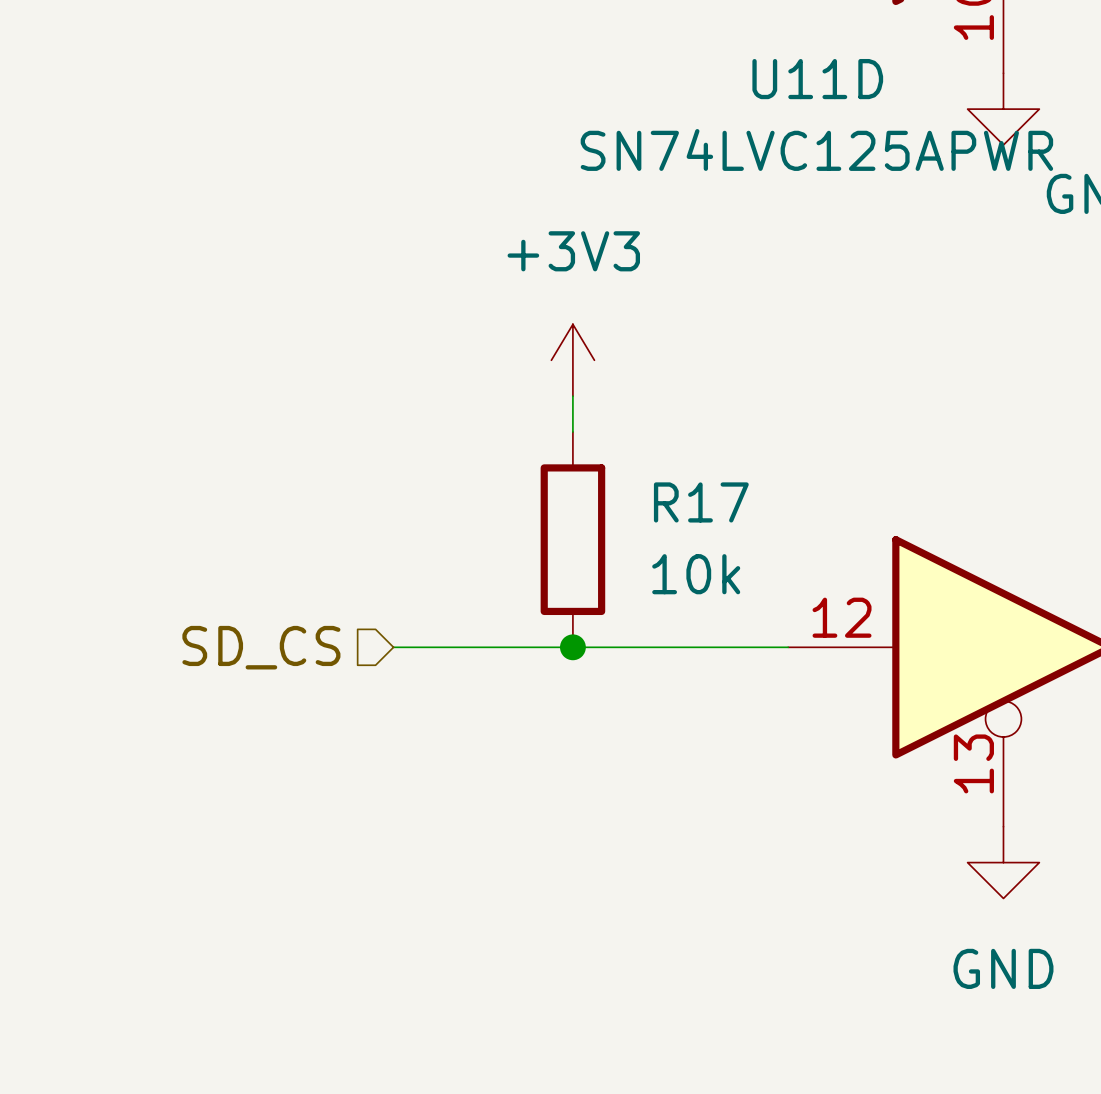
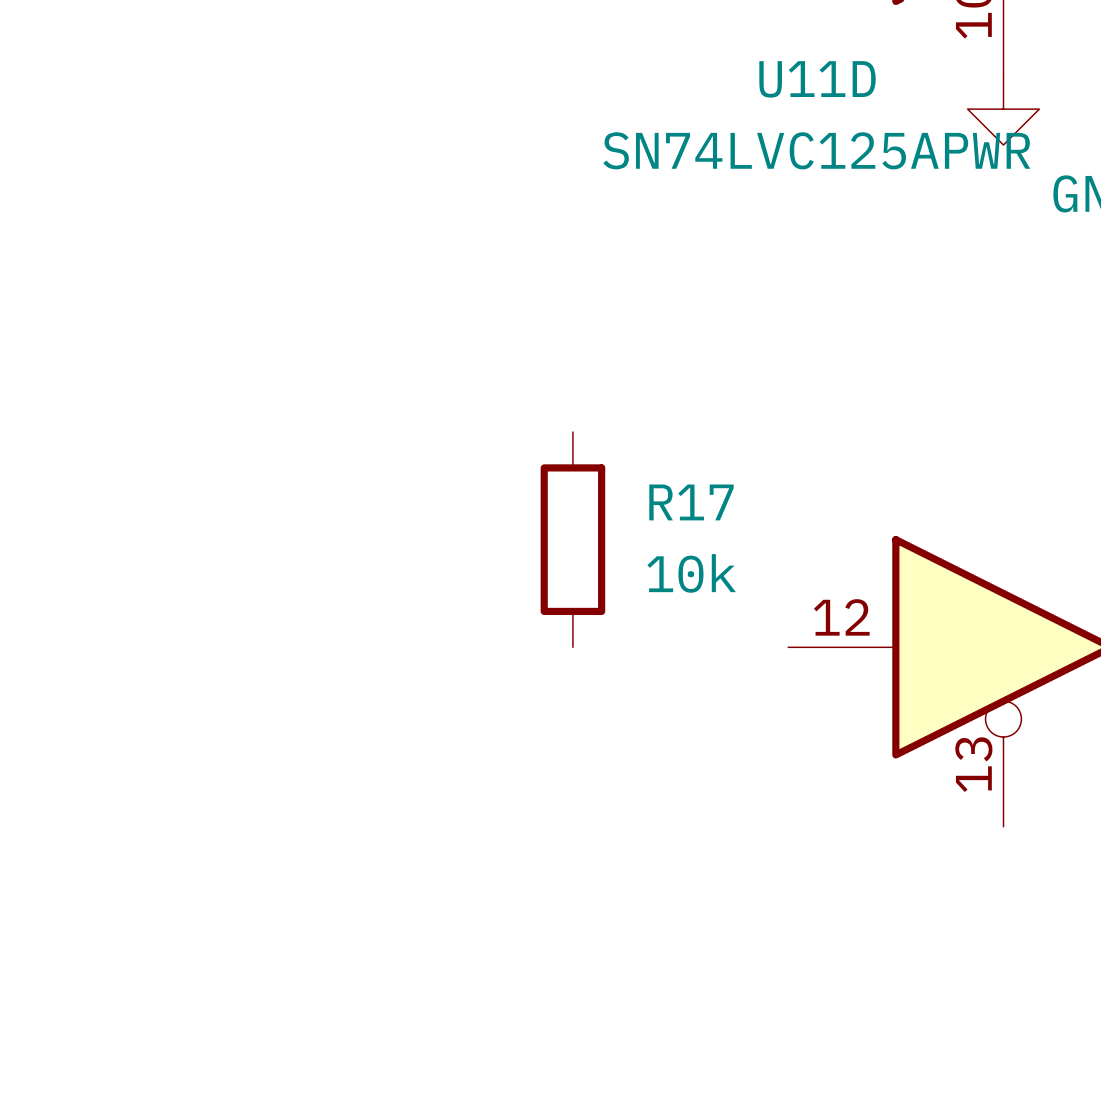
power symbol: +3V3 (572, 360) -> none
wire: (572, 396) (572, 432) -> none
hierarchical label: SD_CS (261, 647) -> none
wire: (393, 647) (788, 647) -> none
junction: (572, 647) -> none
power symbol: GND (1003, 862) -> none

